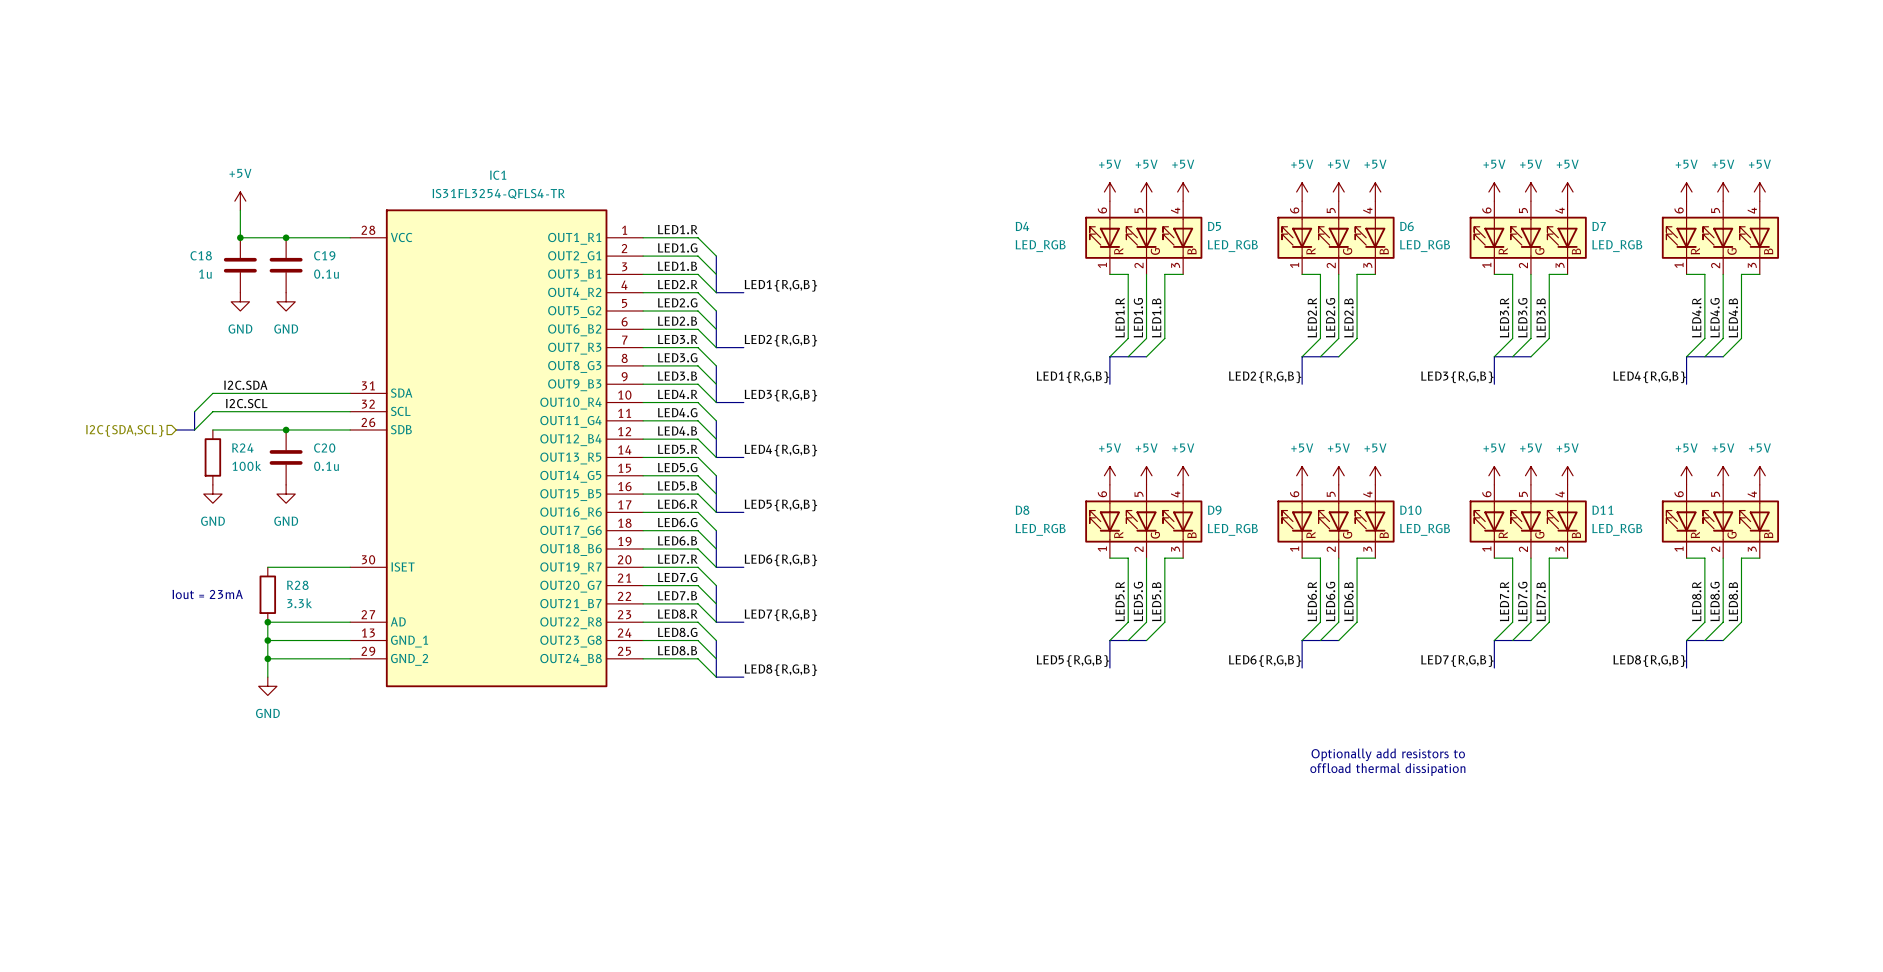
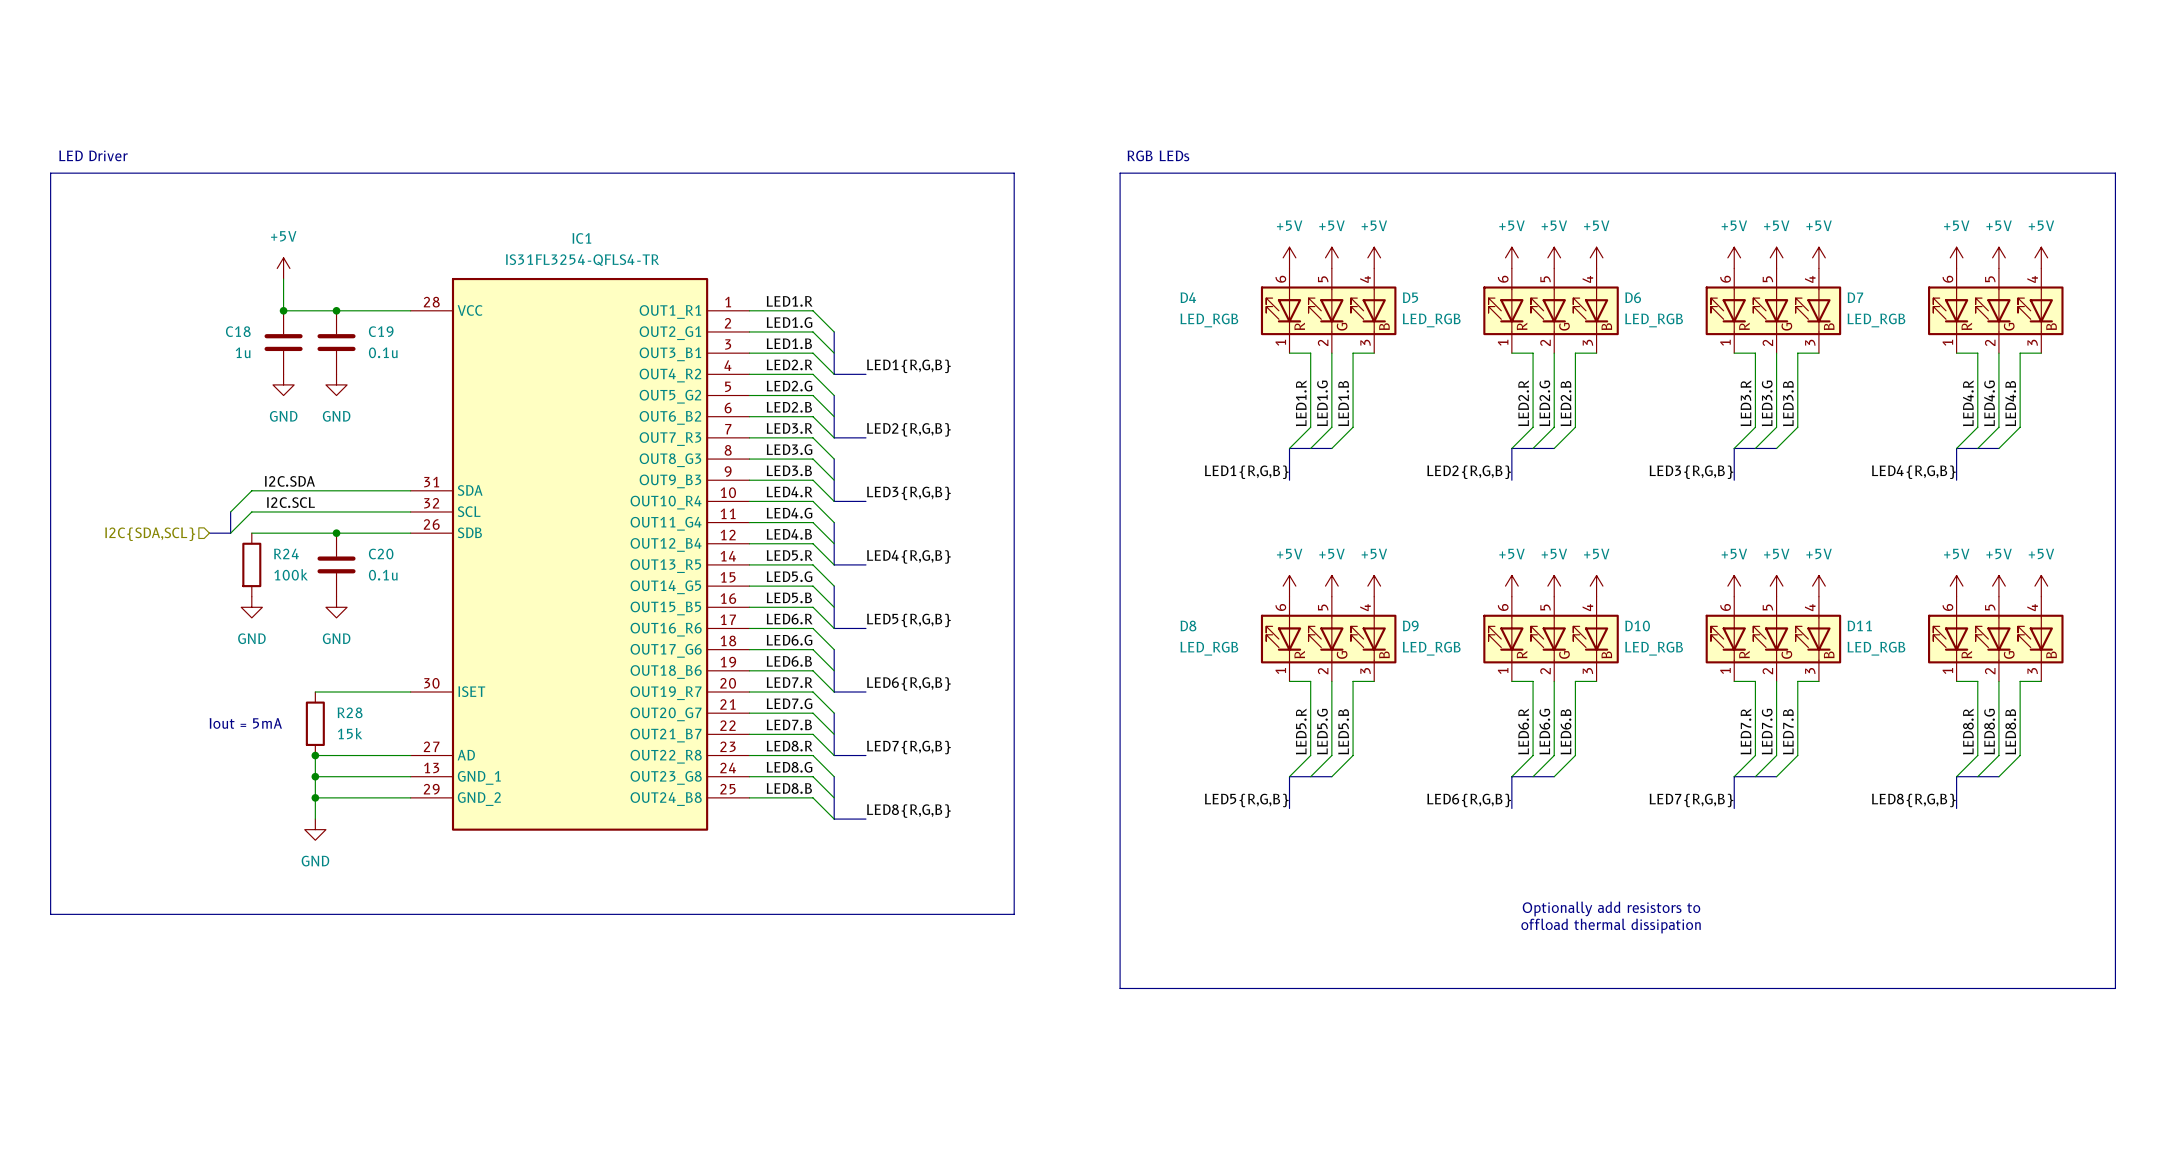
text: none -> LED Driver (93, 155)
text: none -> RGB LEDs (1158, 155)
line: none -> (50, 173) (1014, 173) (1014, 914) (50, 914) (50, 173)
line: none -> (1120, 173) (2115, 173) (2115, 988) (1120, 988) (1120, 173)
text: Iout = 23mA (207, 594) -> Iout = 5mA (245, 723)
R28 value: 3.3k (299, 603) -> 15k (350, 733)

